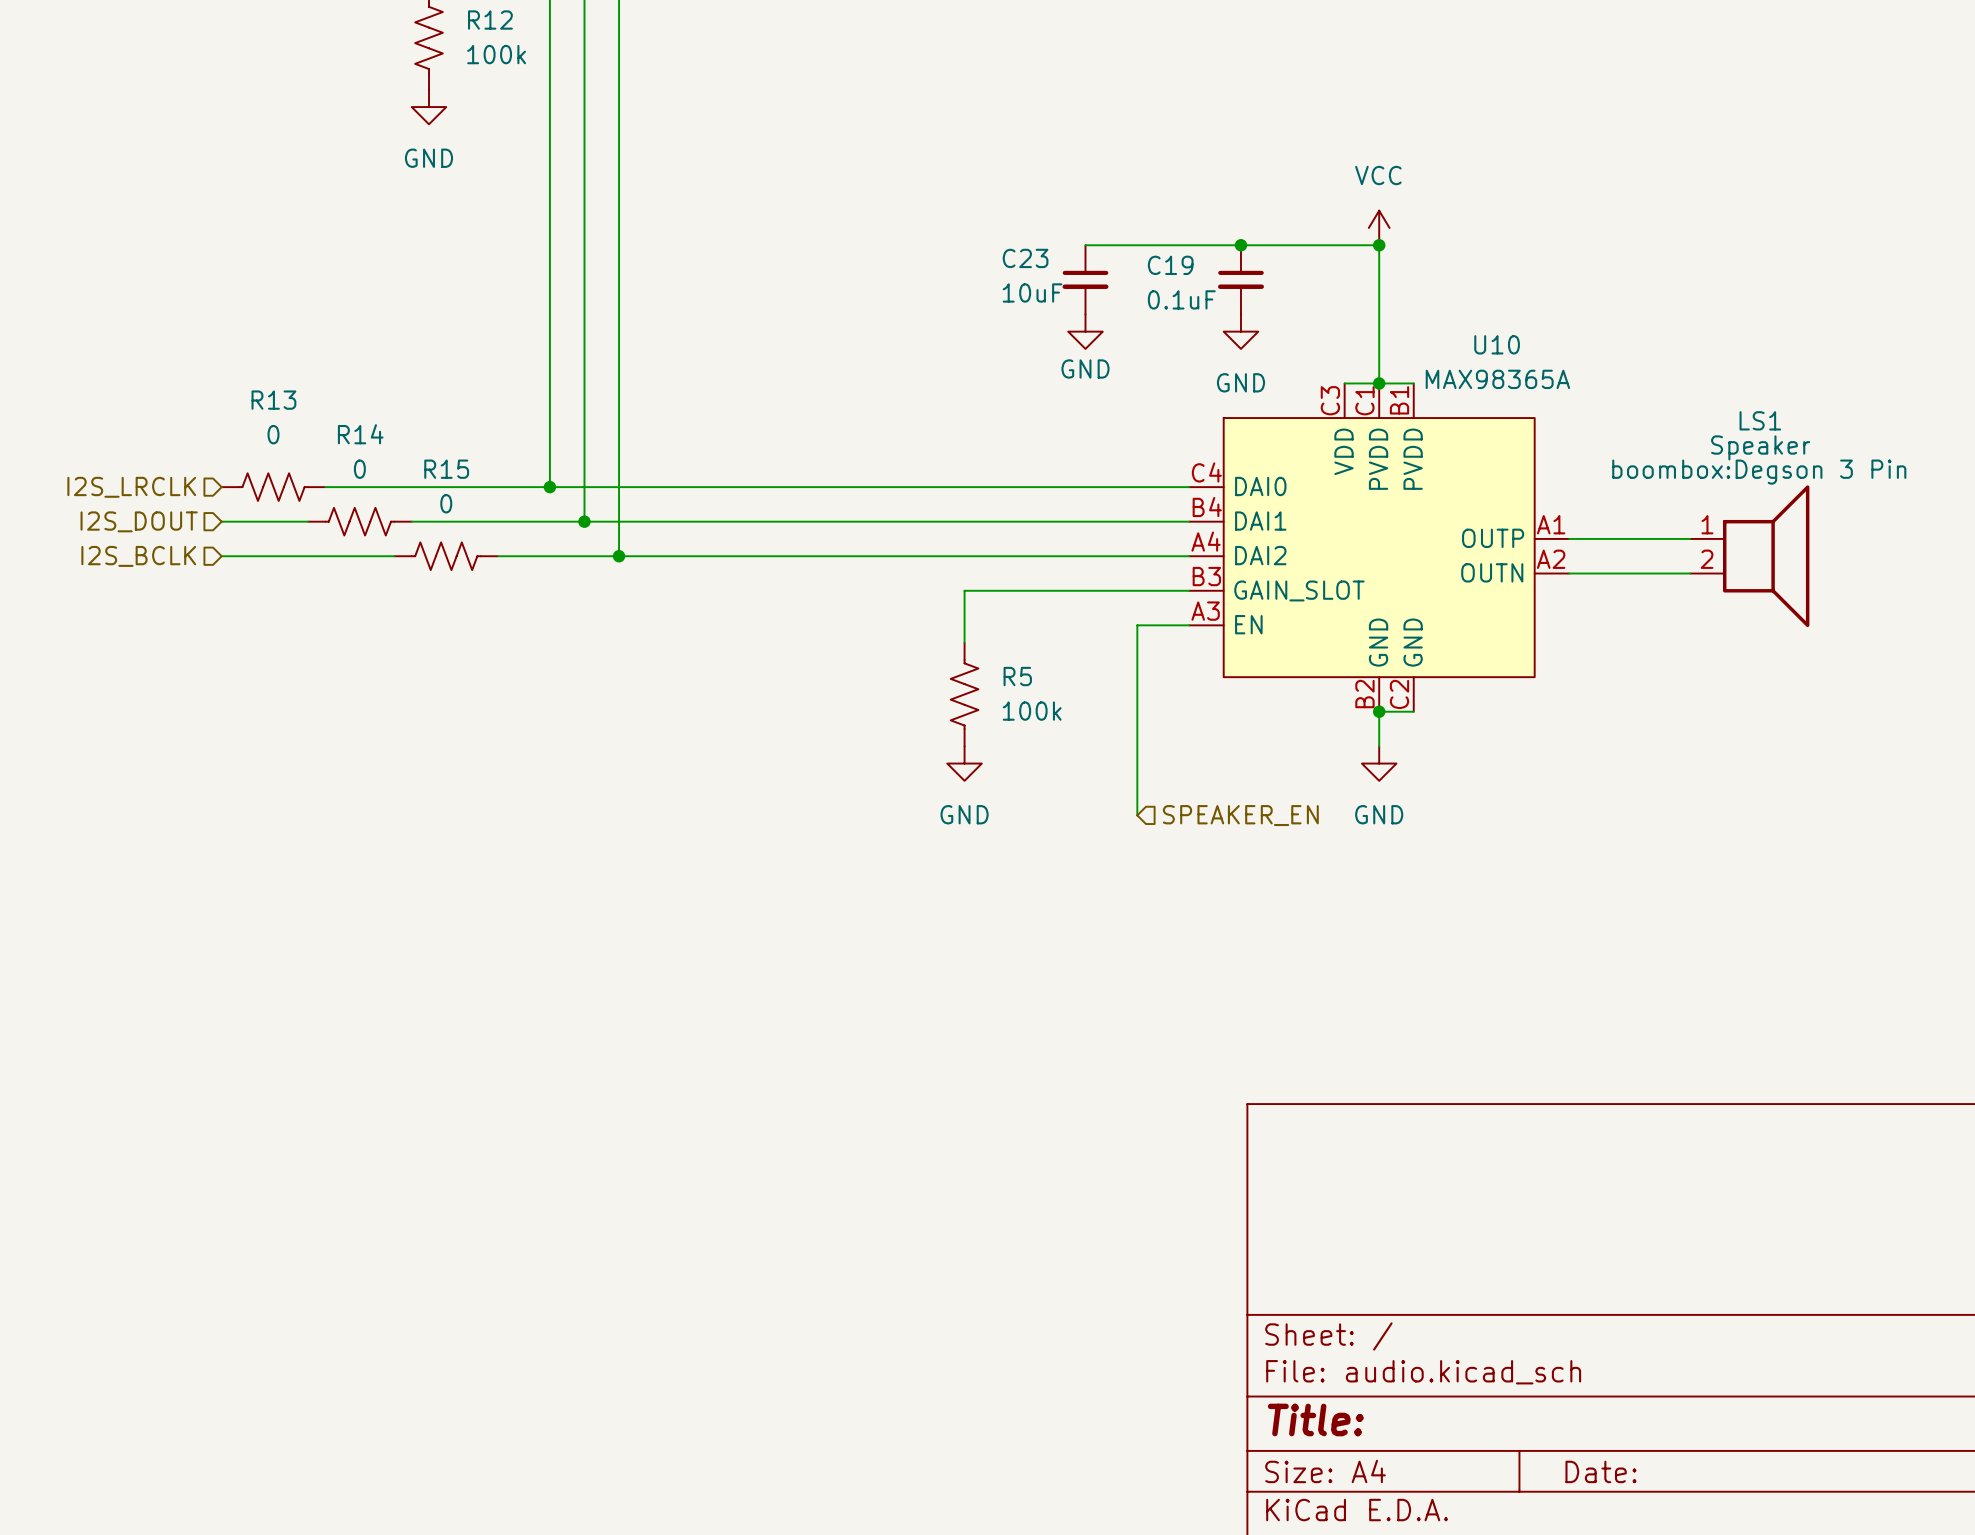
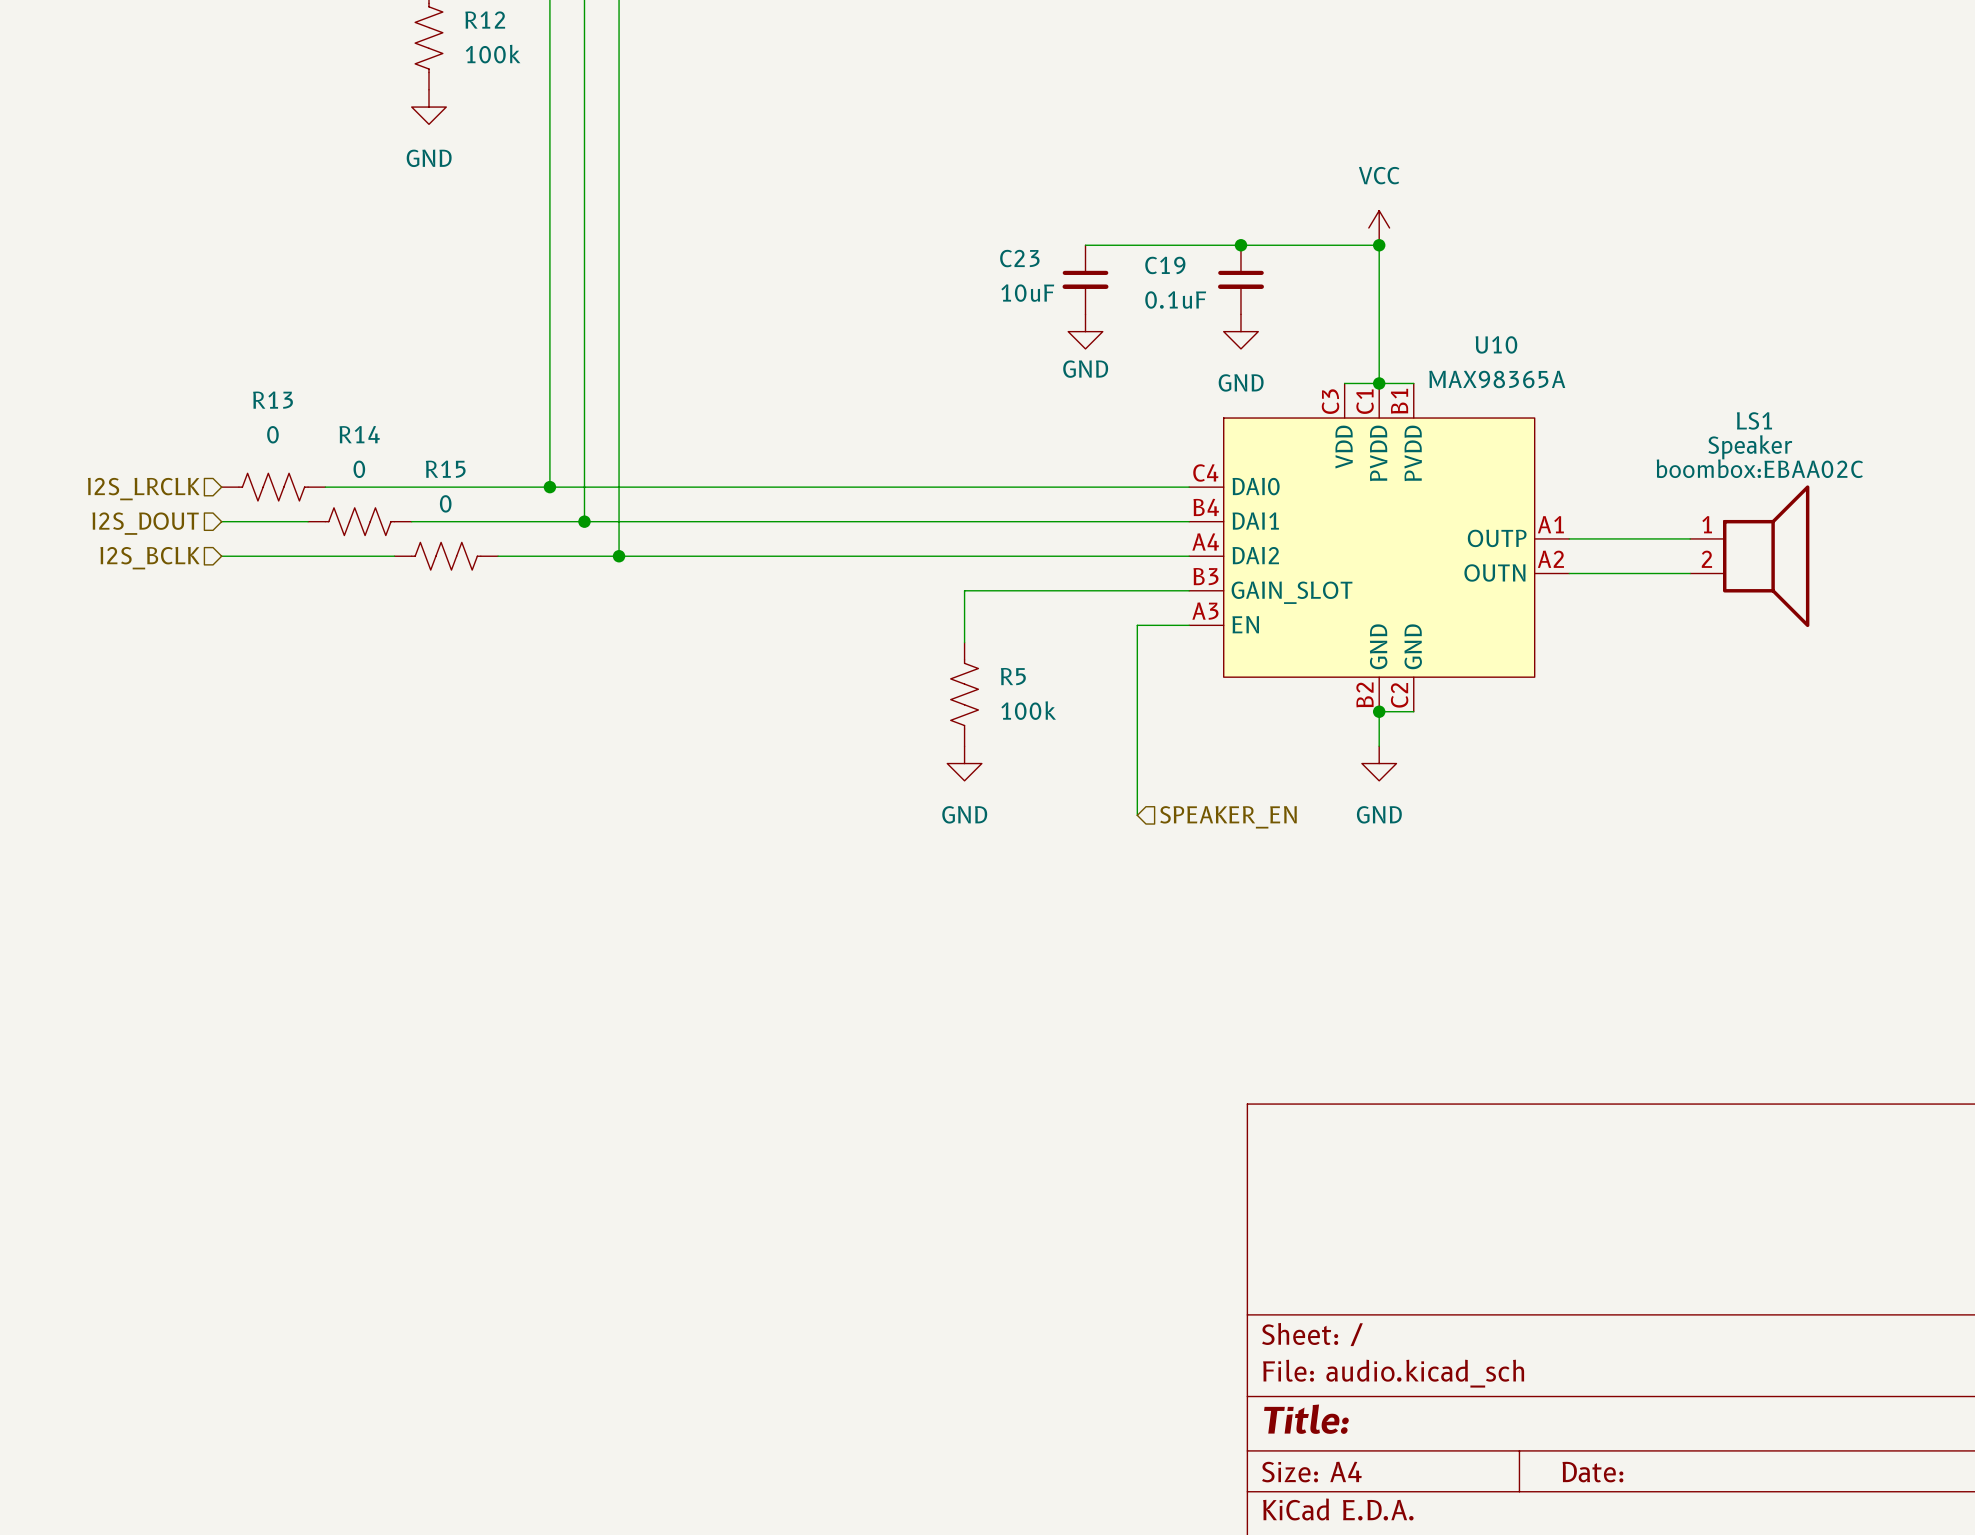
LS1 text: boombox:Degson 3 Pin (1759, 472) -> boombox:EBAA02C (1759, 468)

